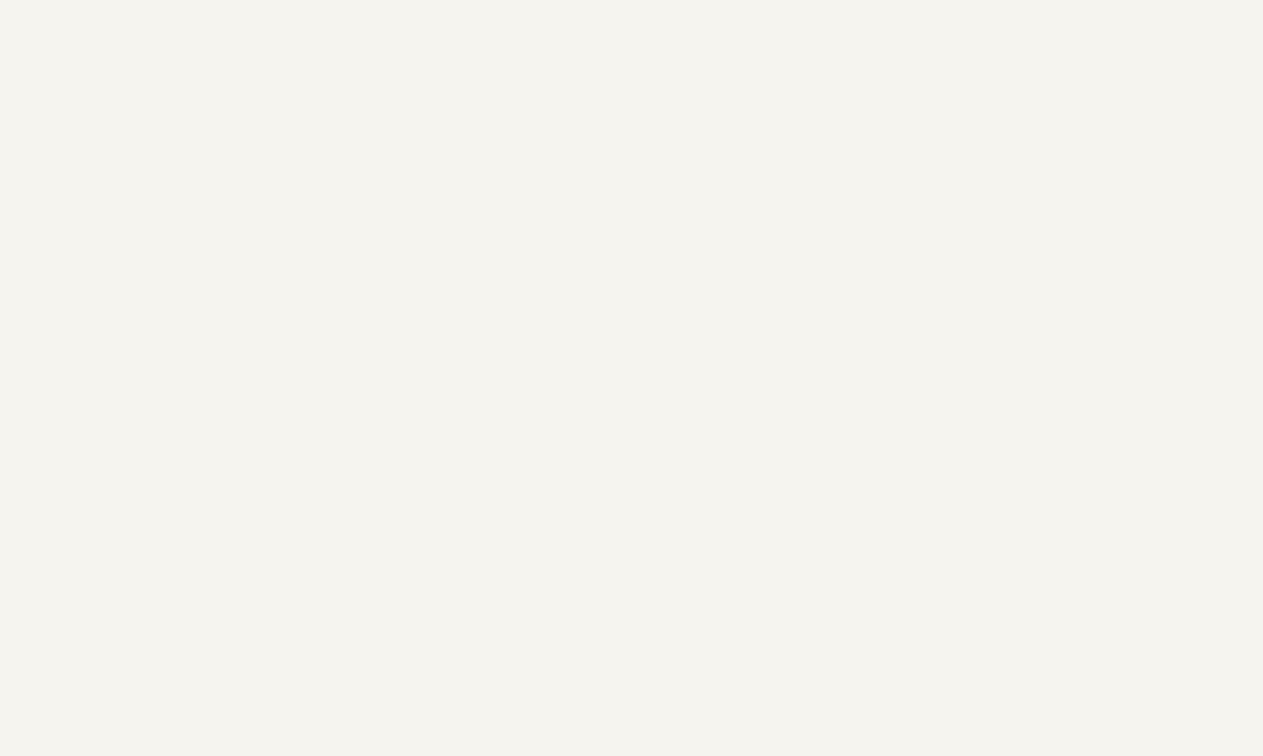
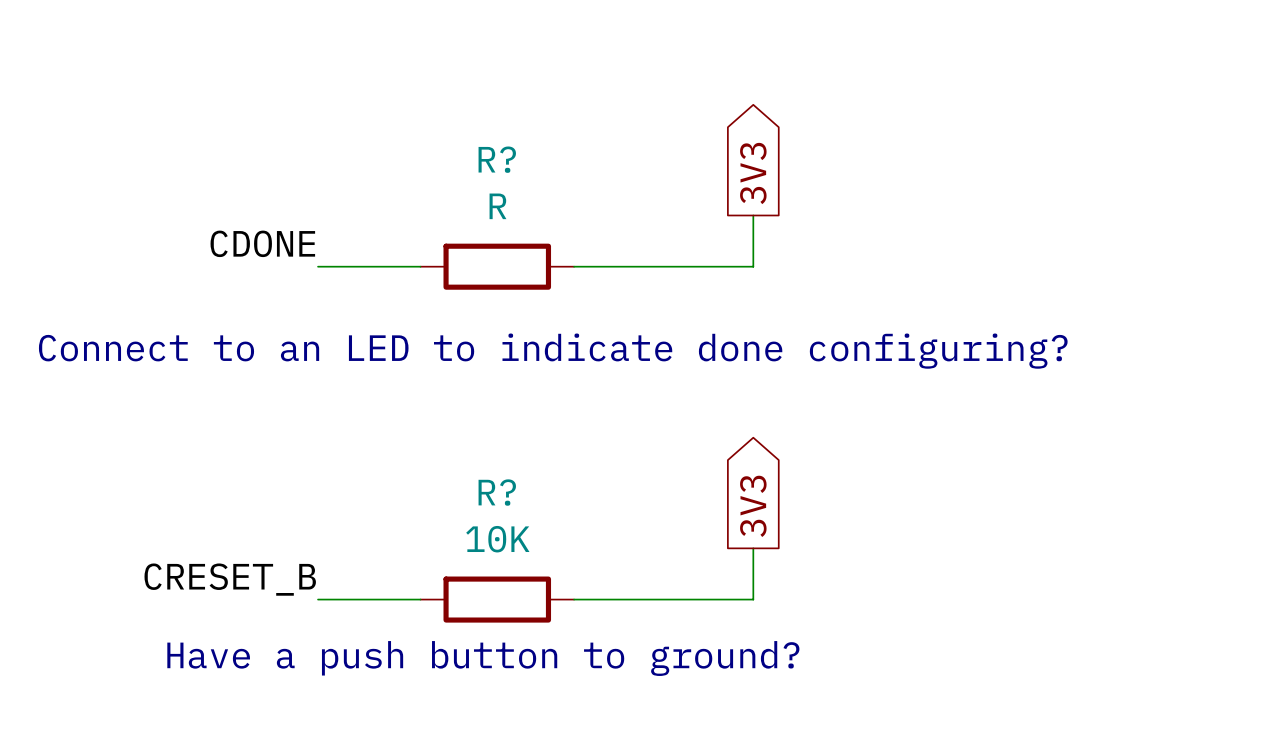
global label: none -> 3V3 (753, 173)
wire: none -> (753, 215) (753, 266) (574, 266)
label: none -> CDONE (262, 243)
wire: none -> (318, 266) (420, 266)
R?: none -> R (497, 266)
text: none -> Connect to an LED to indicate done configuring? (553, 351)
global label: none -> 3V3 (753, 506)
wire: none -> (753, 548) (753, 599) (574, 599)
label: none -> CRESET_B (230, 579)
wire: none -> (318, 599) (420, 599)
R?: none -> 10K (497, 599)
text: none -> Have a push button to ground? (483, 658)

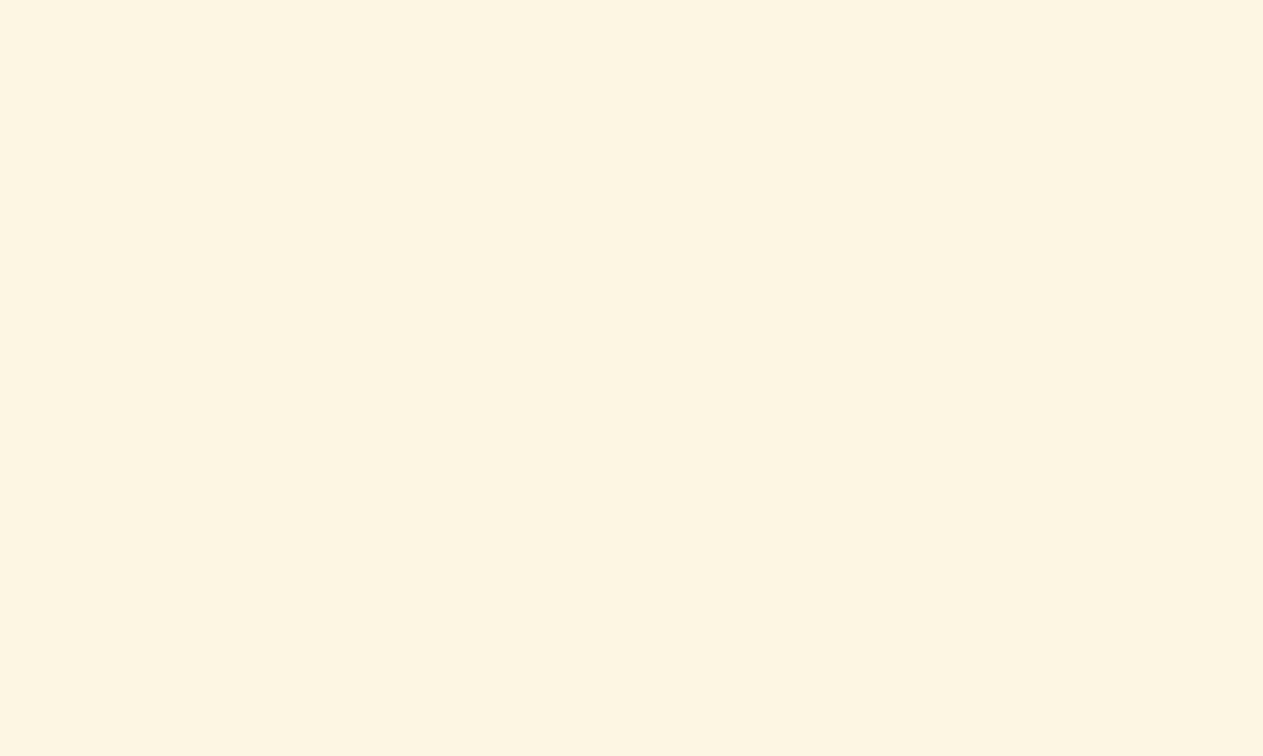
global label: 3V3 (753, 173) -> none
wire: (753, 215) (753, 266) (574, 266) -> none
label: CDONE (262, 243) -> none
wire: (318, 266) (420, 266) -> none
R?: R (497, 266) -> none
text: Connect to an LED to indicate done configuring? (553, 351) -> none
global label: 3V3 (753, 506) -> none
wire: (753, 548) (753, 599) (574, 599) -> none
label: CRESET_B (230, 579) -> none
wire: (318, 599) (420, 599) -> none
R?: 10K (497, 599) -> none
text: Have a push button to ground? (483, 658) -> none

